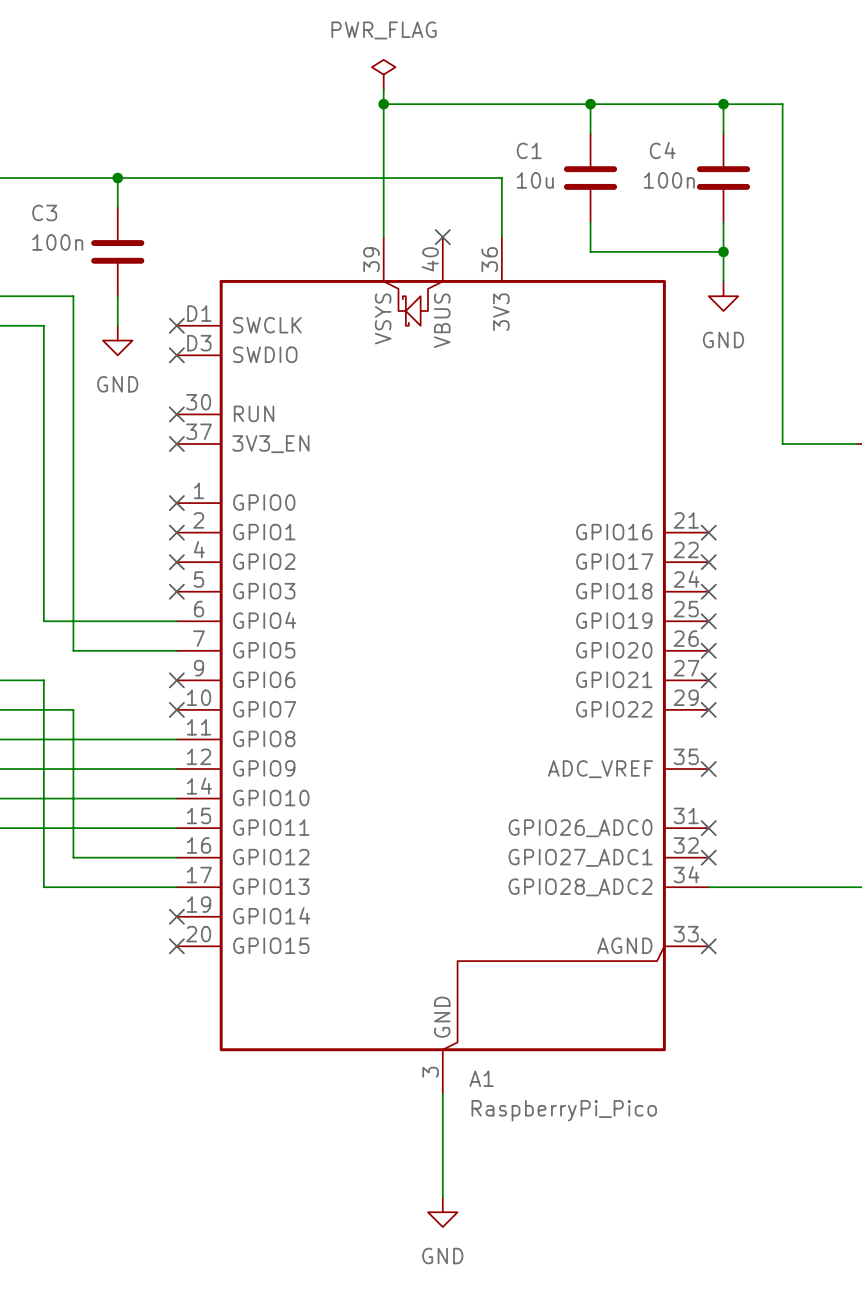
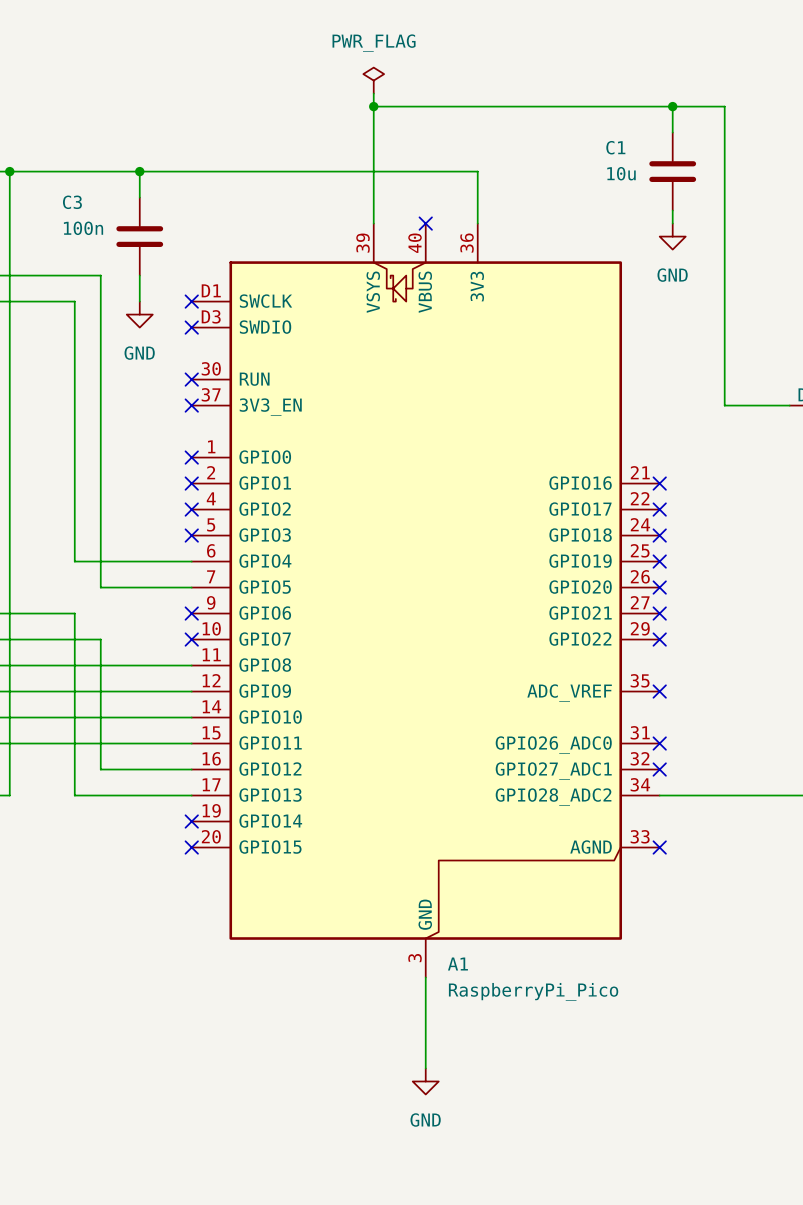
wire: (590, 104) (590, 133) -> none
junction: (590, 104) -> none
C4 name: C4 (662, 150) -> C1 (615, 147)
C1: 10u (590, 178) -> none
C4 value: 100n (669, 180) -> 10u (621, 173)
wire: (590, 222) (590, 251) (723, 251) -> none
wire: (723, 237) (723, 281) -> none
junction: (723, 251) -> none
power symbol position: GND (723, 296) -> GND (672, 236)

